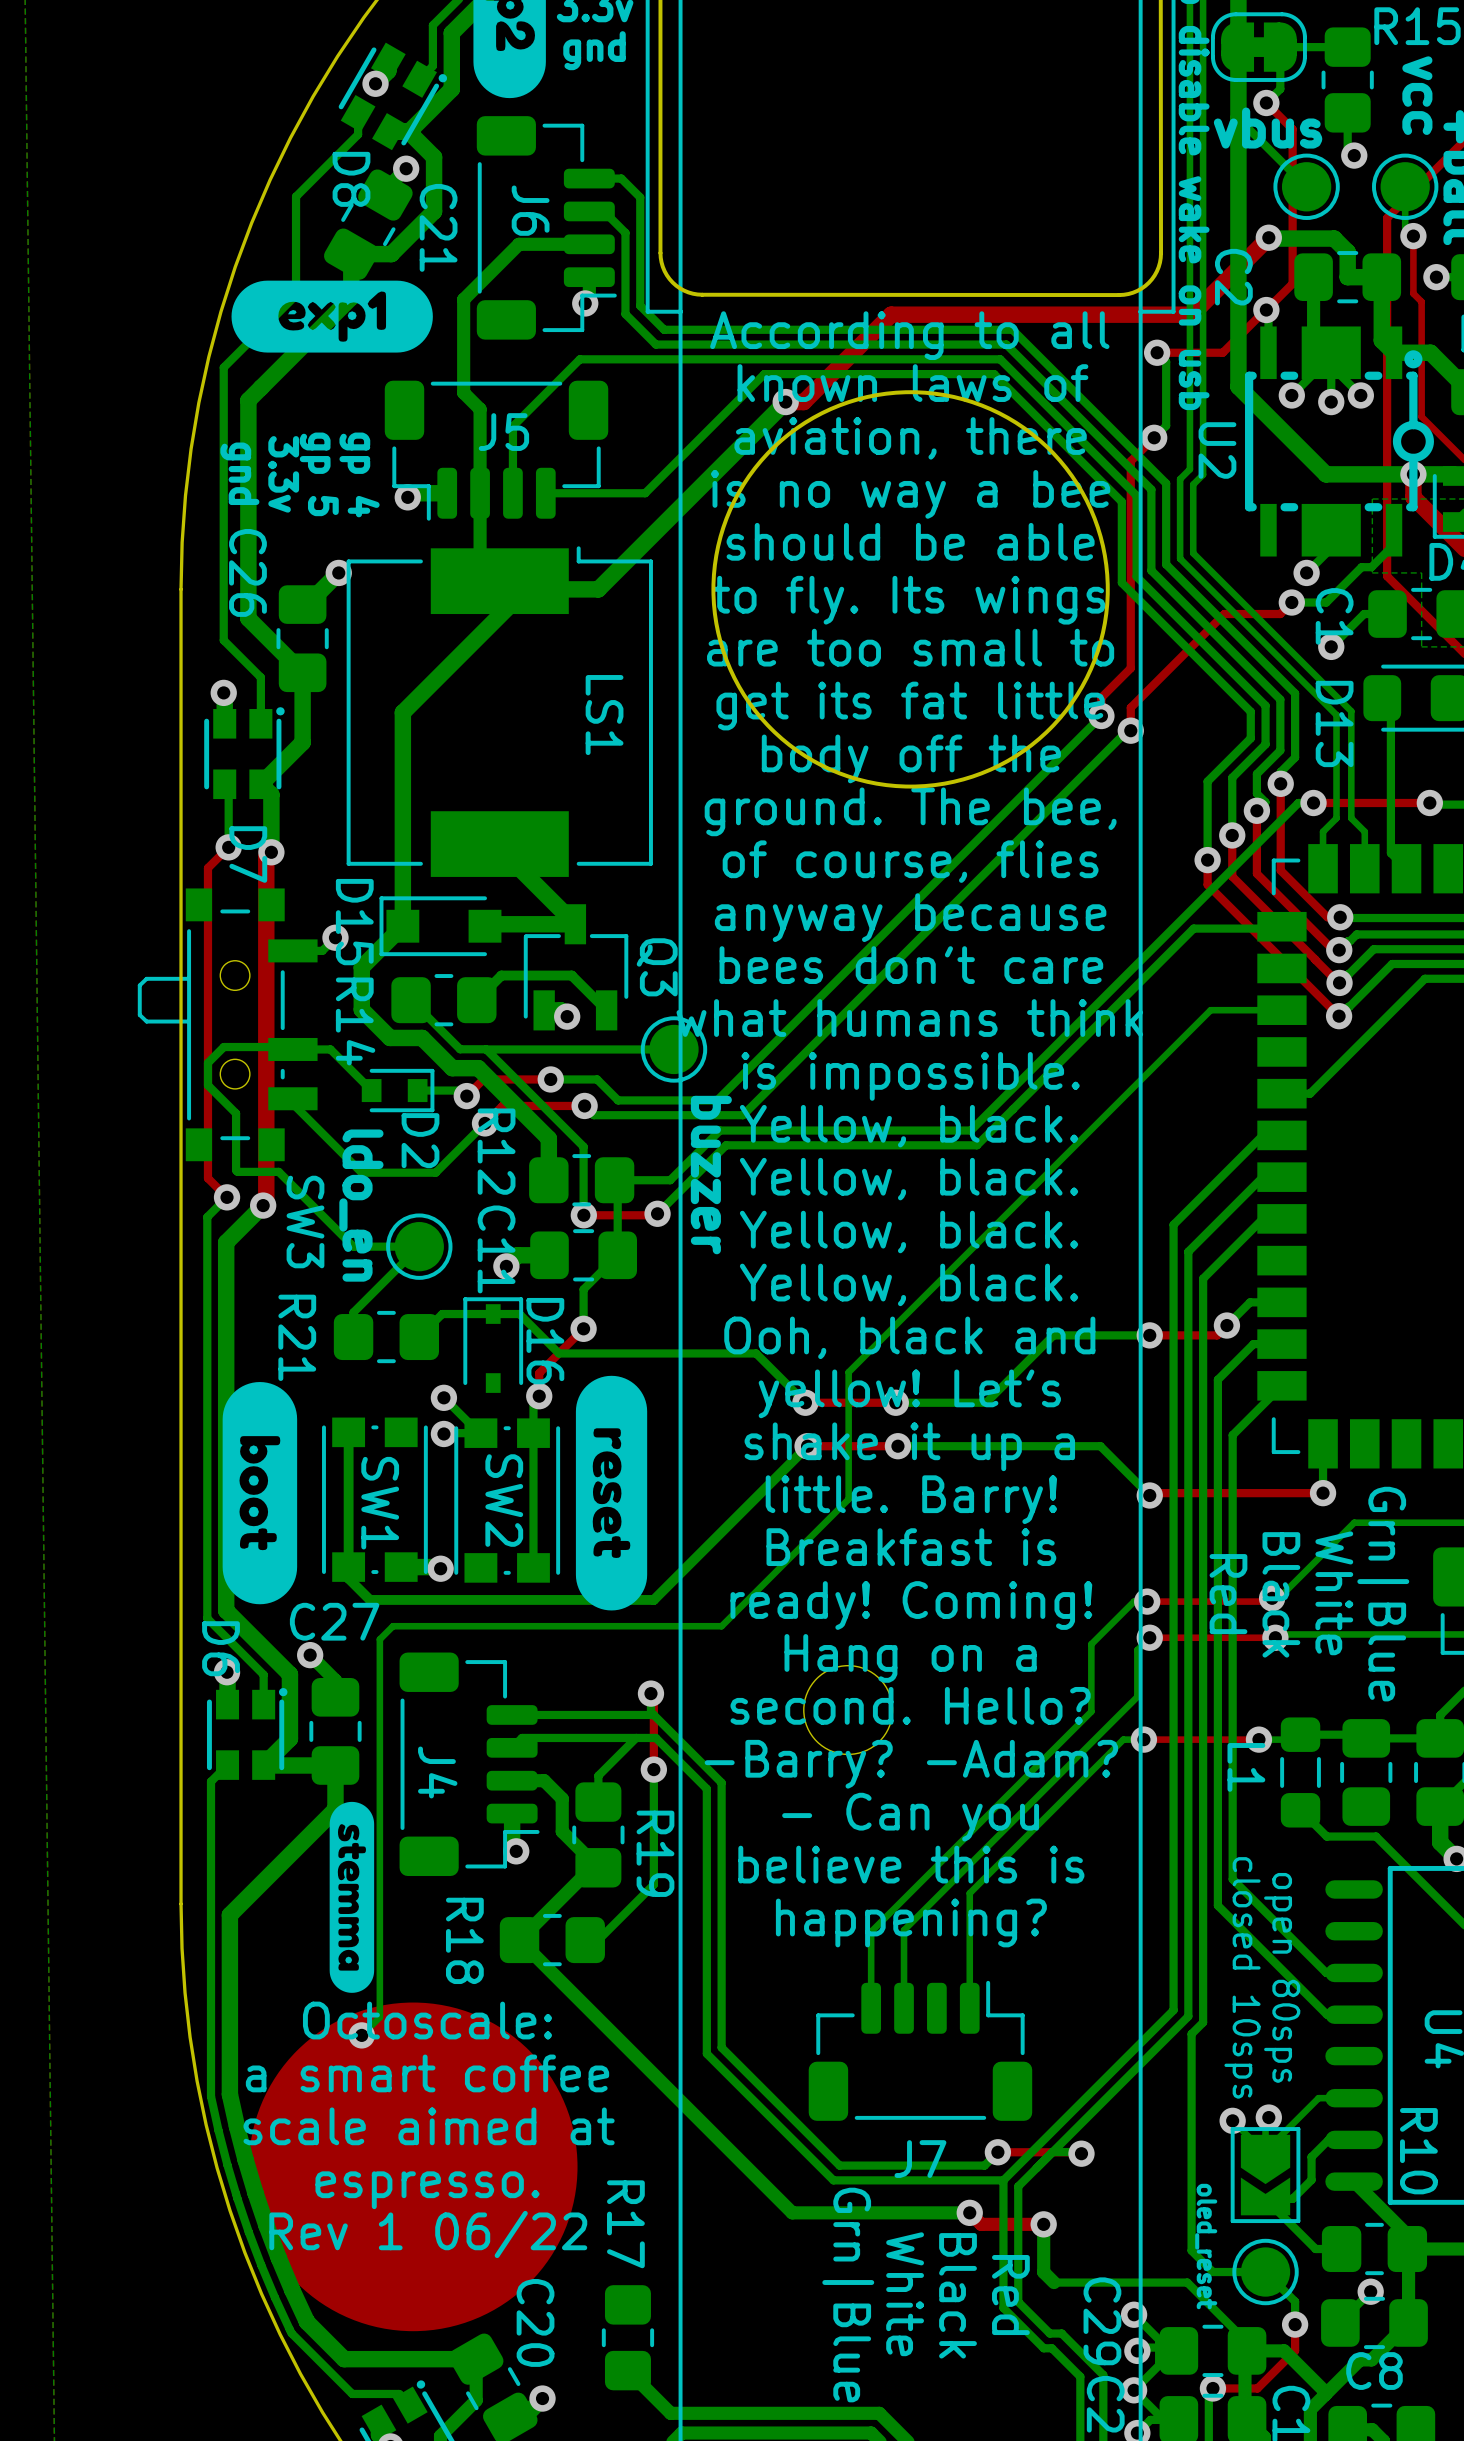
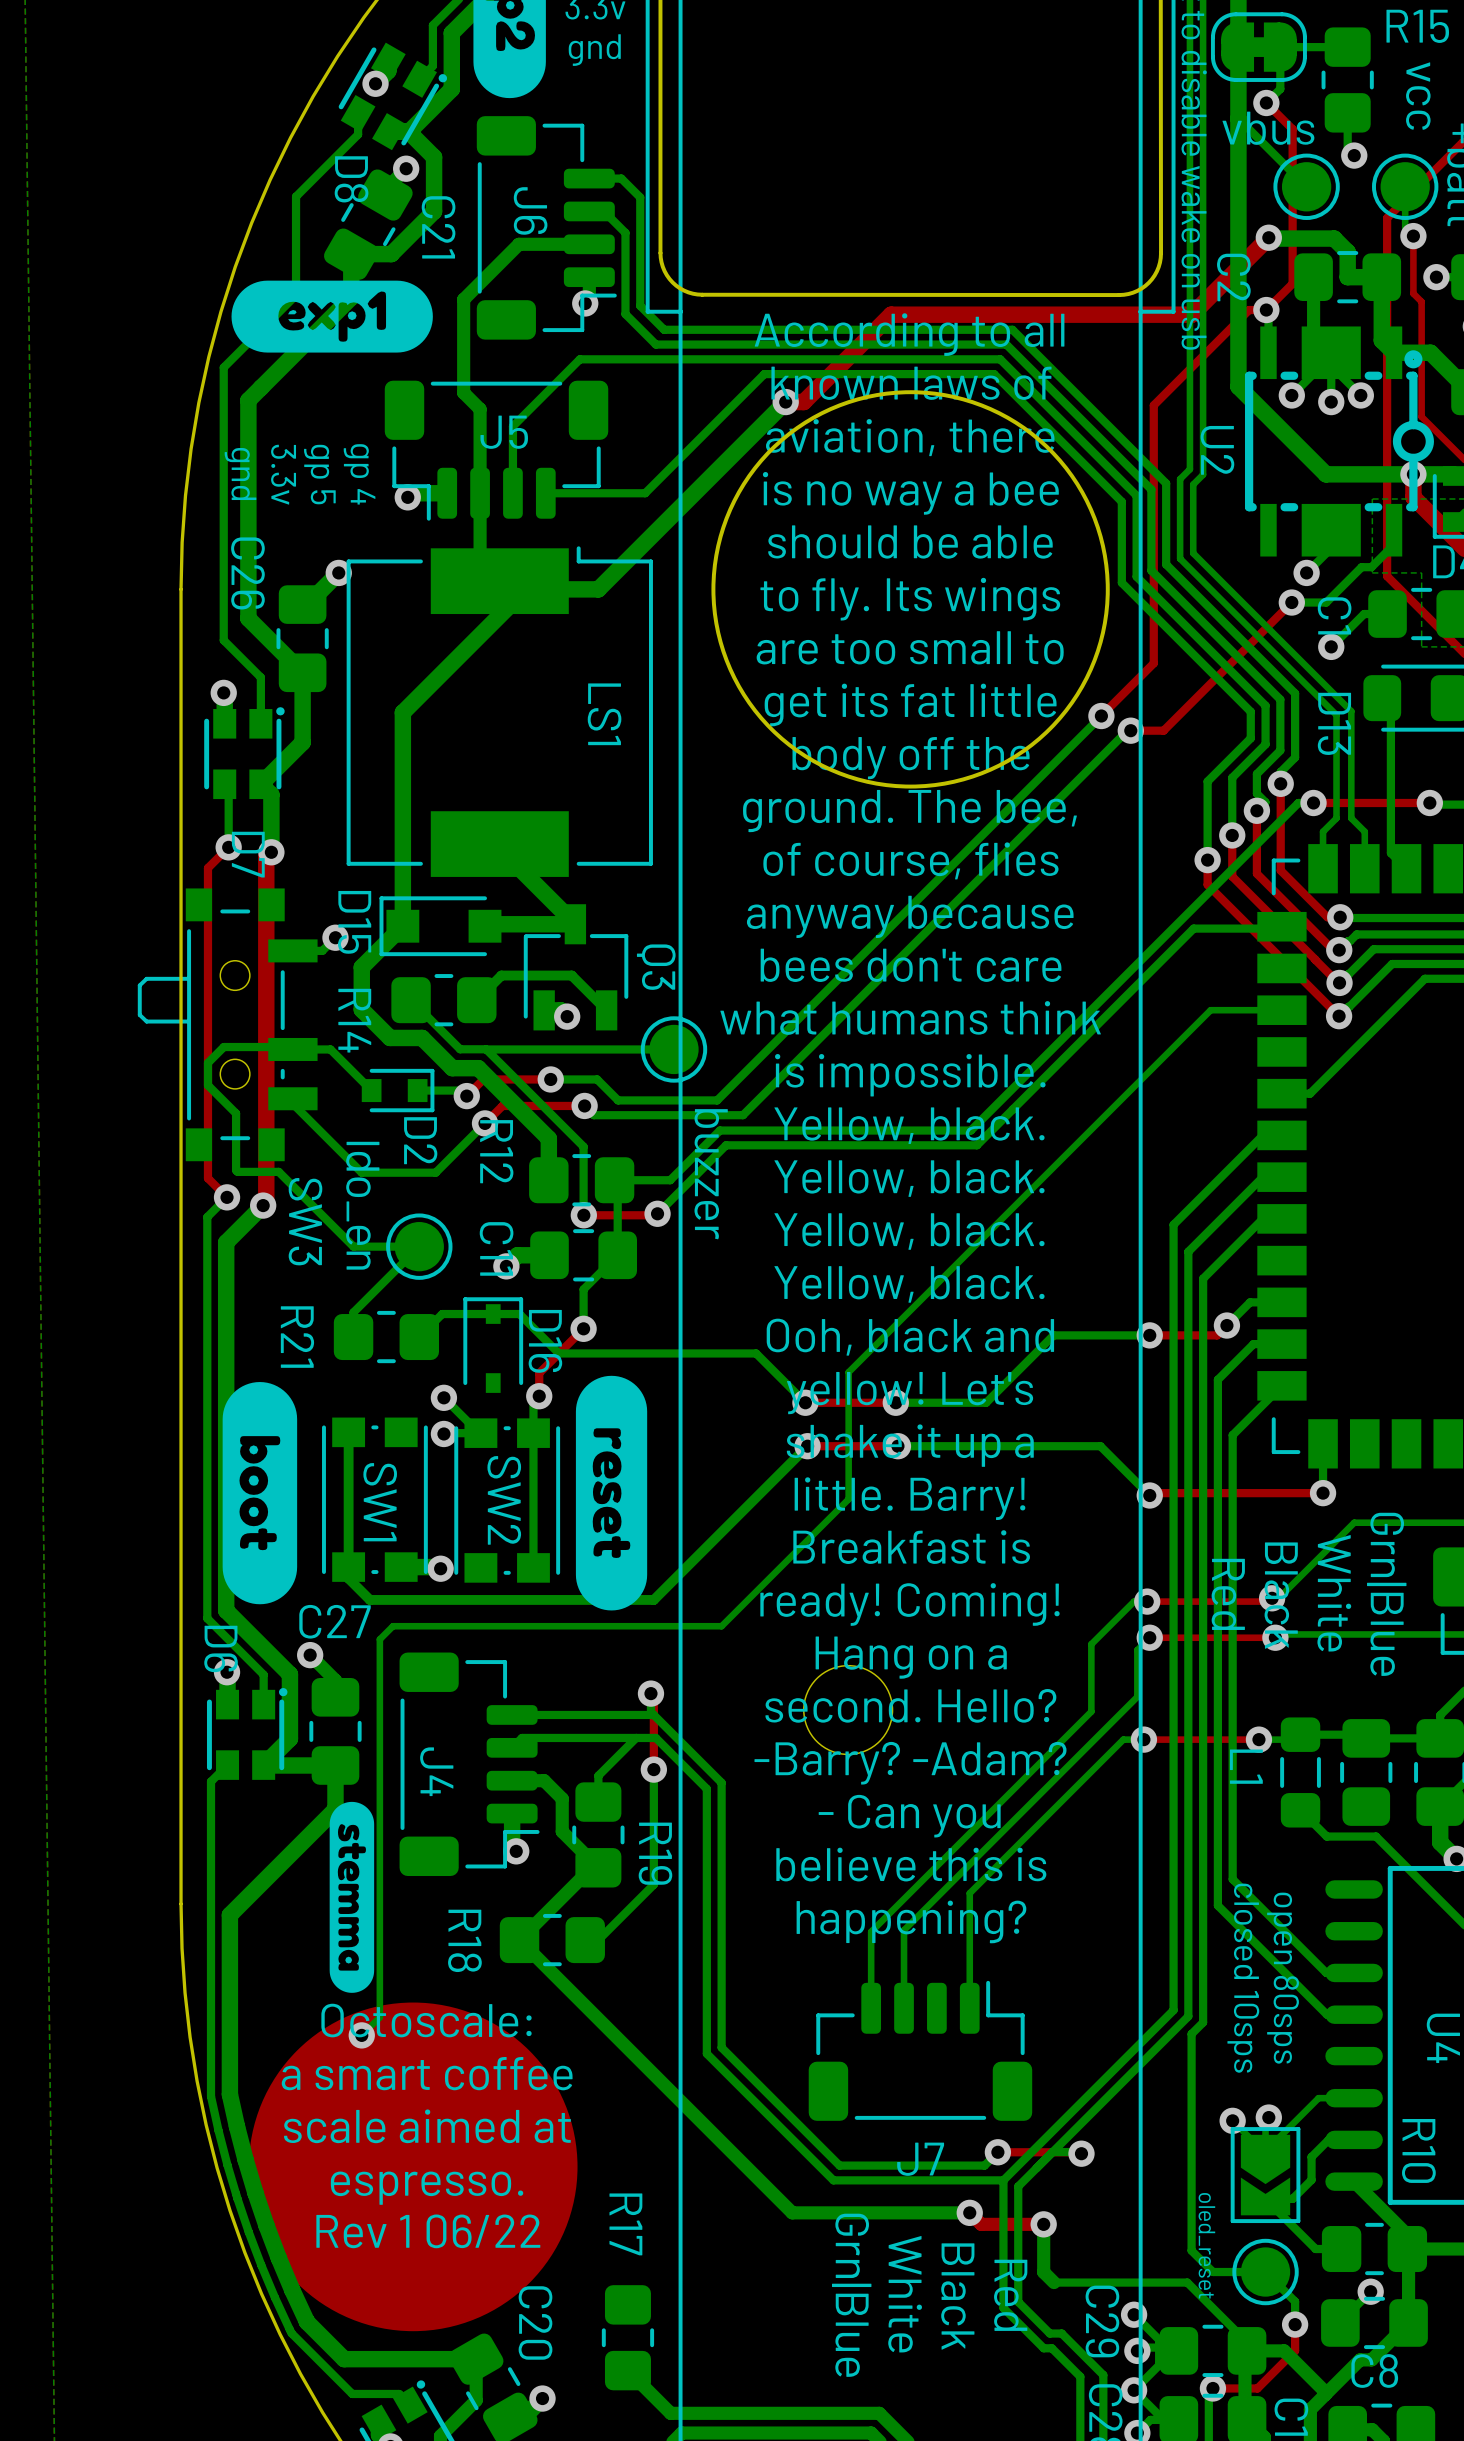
top track: (1265, 310) (1222, 352) (1157, 352) -> none
bottom track: (1157, 352) (1166, 361) (1166, 425) (1154, 437) -> none
via: (1157, 352) -> none
top track: (1154, 437) (1130, 461) (1130, 668) (1101, 697) (1101, 715) -> (1265, 310) (1249, 310) (1153, 405) (1153, 663) (1101, 715)
via: (1154, 437) -> none
top track: (1280, 614) (1224, 614) (1130, 707) (1130, 730) -> (1280, 614) (1163, 730) (1130, 730)

